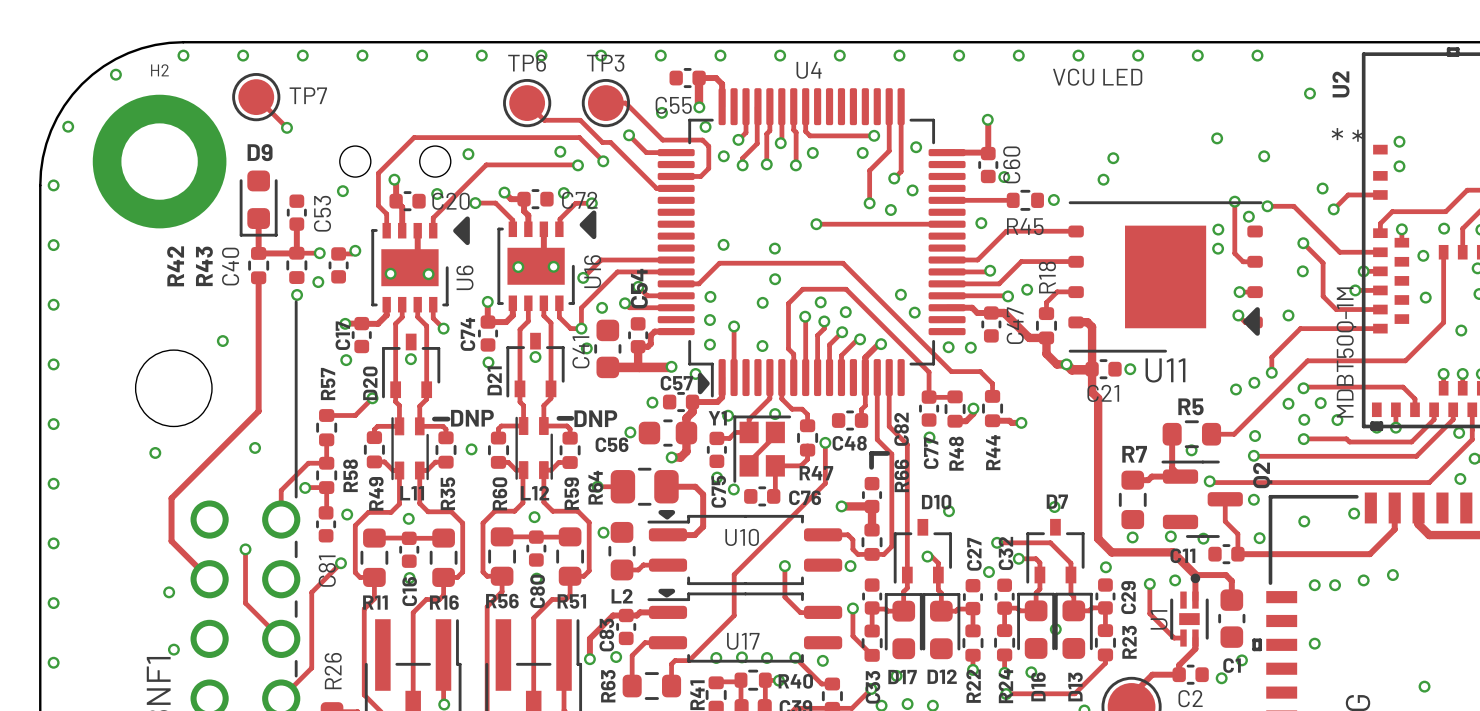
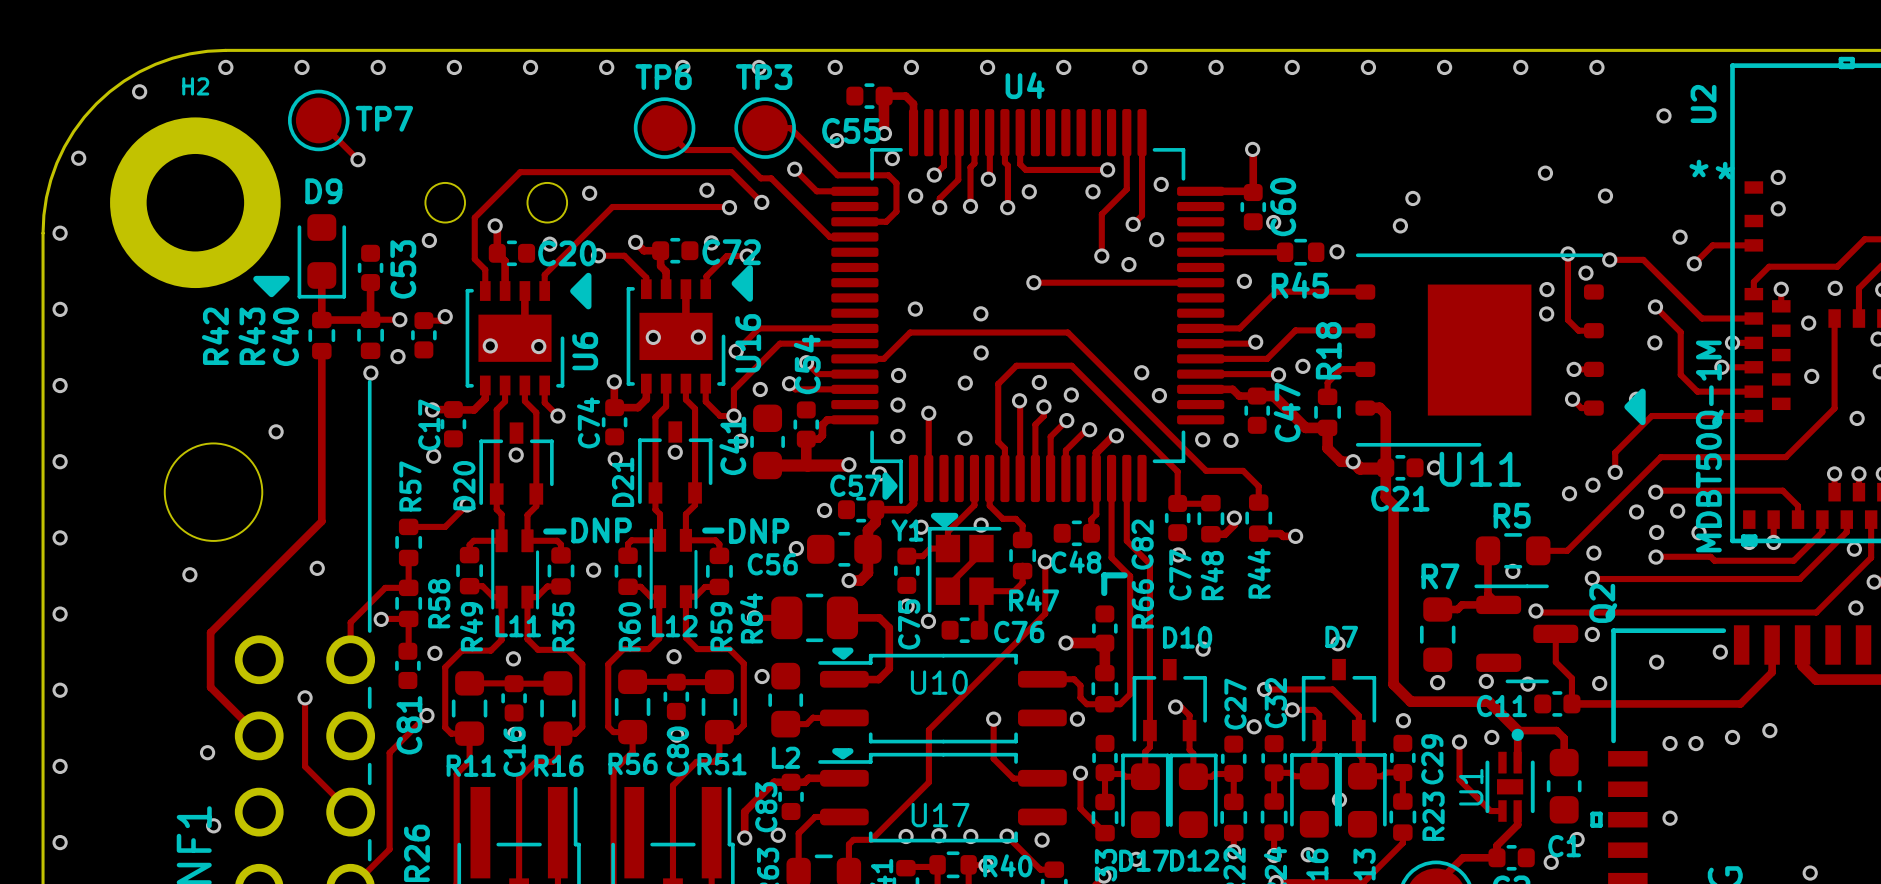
text: VCU LED (1097, 77) -> none
drawing: none -> [253, 275, 290, 298]
drawing position: (1251, 321) -> (1635, 406)
drawing: none -> [930, 512, 959, 529]

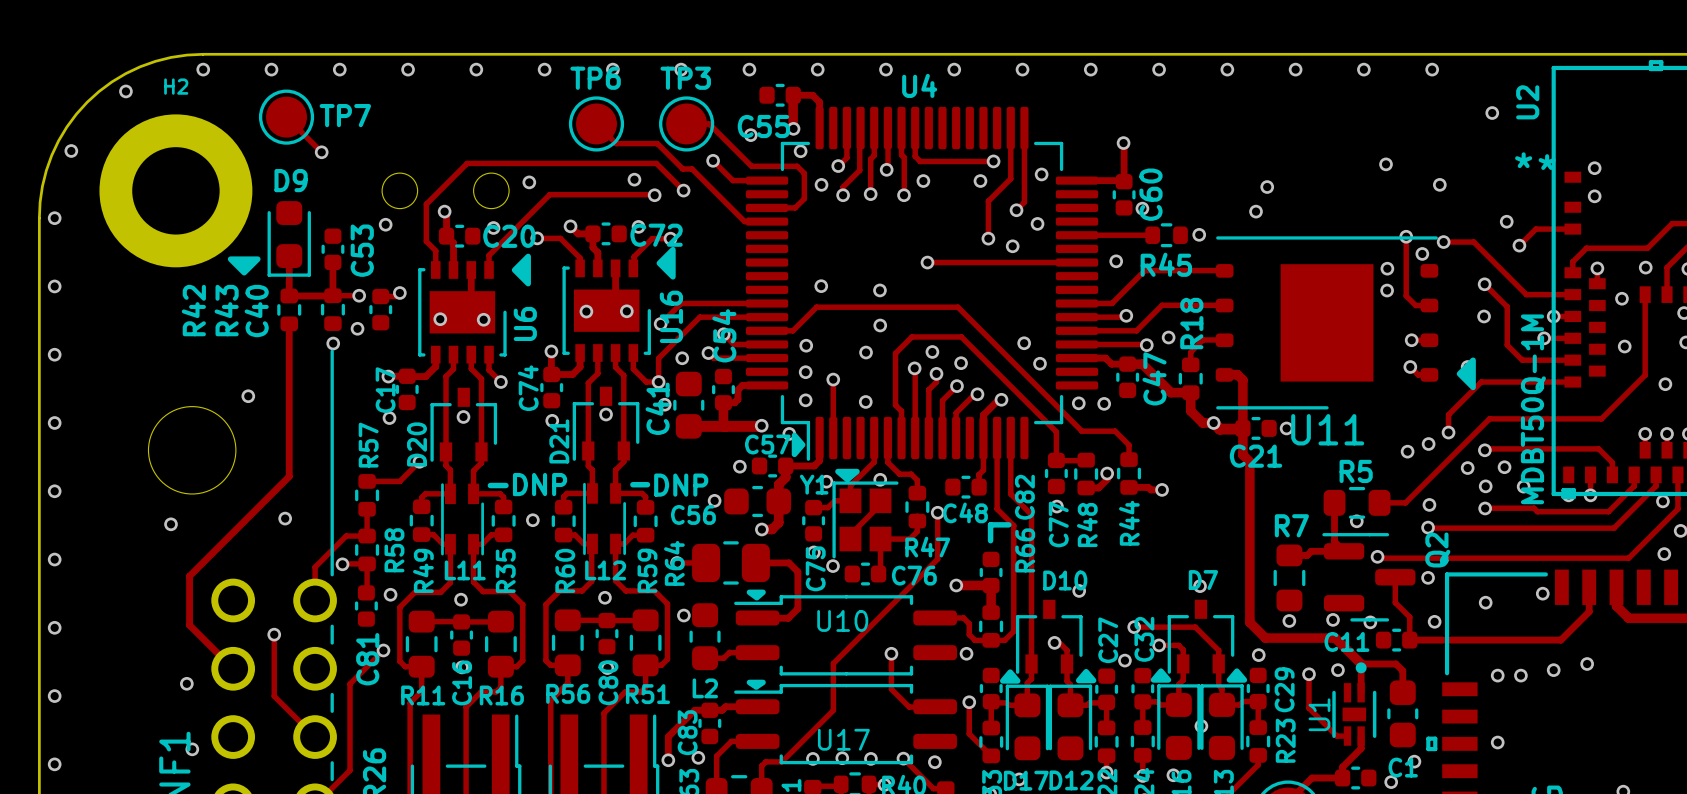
drawing: none -> [1150, 668, 1172, 683]
drawing: none -> [1226, 668, 1248, 683]
drawing: none -> [999, 669, 1021, 684]
drawing: none -> [1075, 668, 1097, 684]

